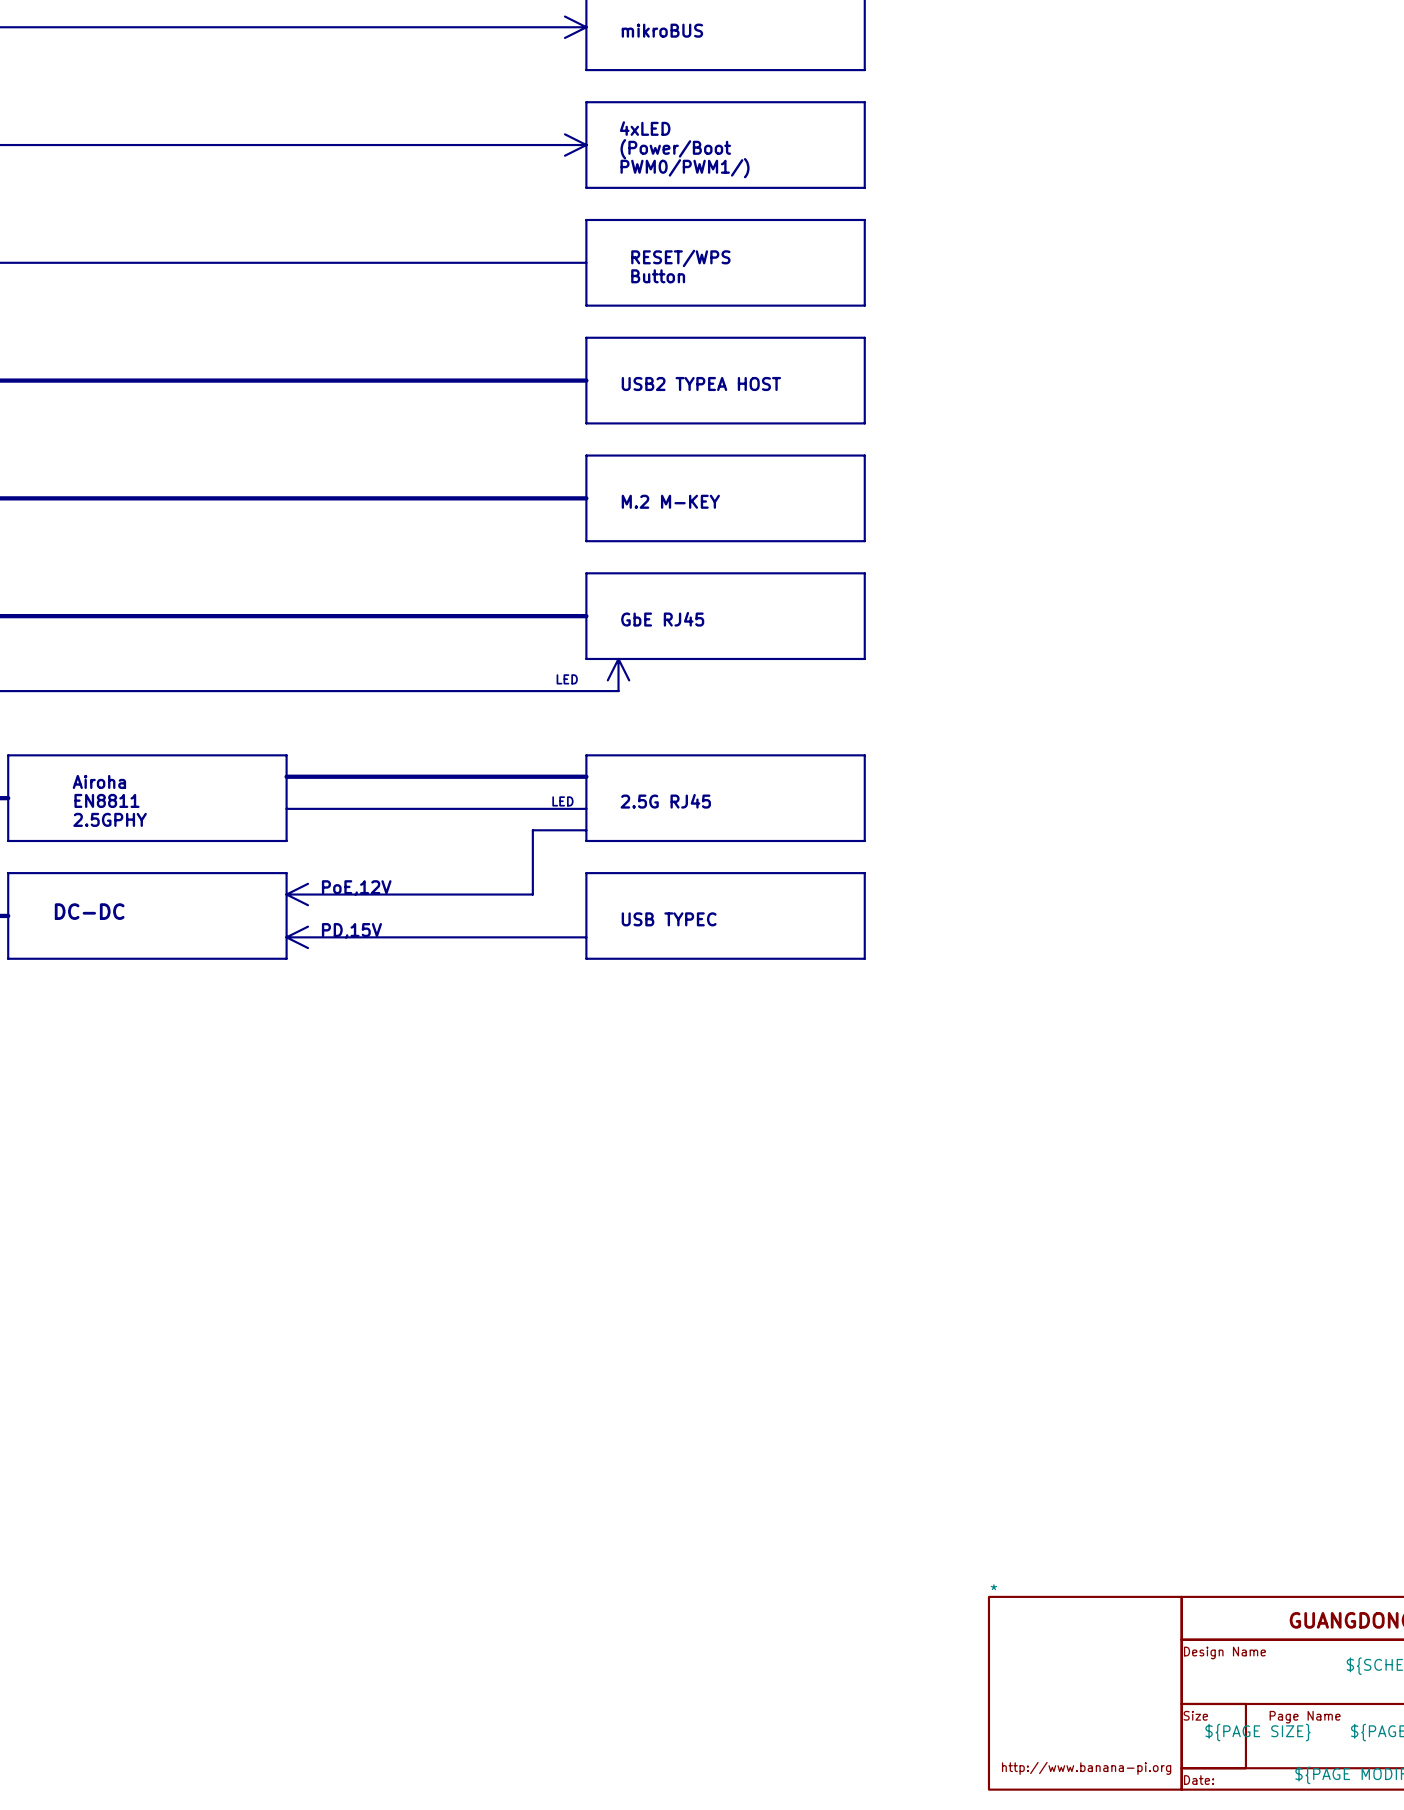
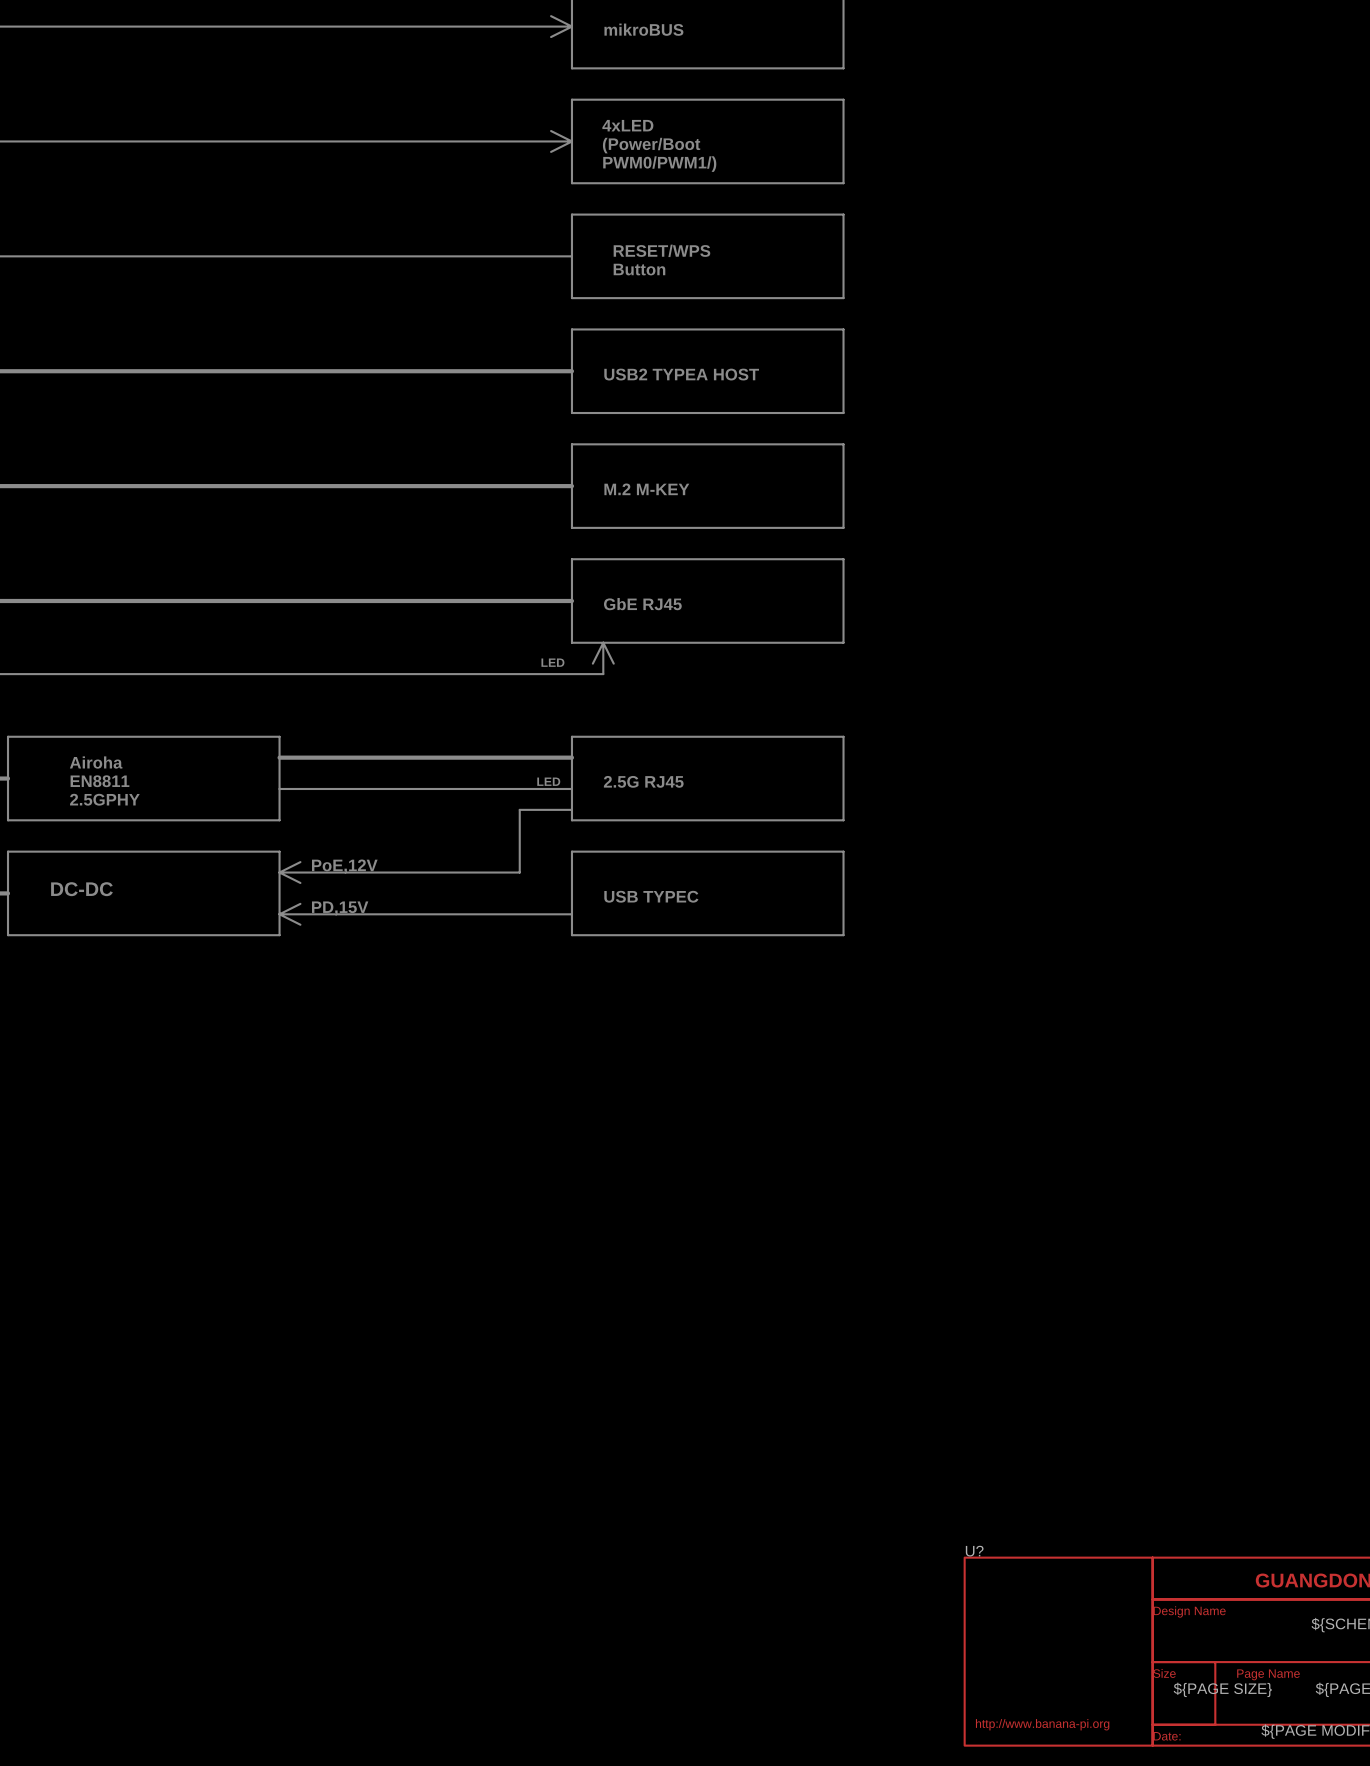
U? name: * (993, 1587) -> U? (974, 1551)

